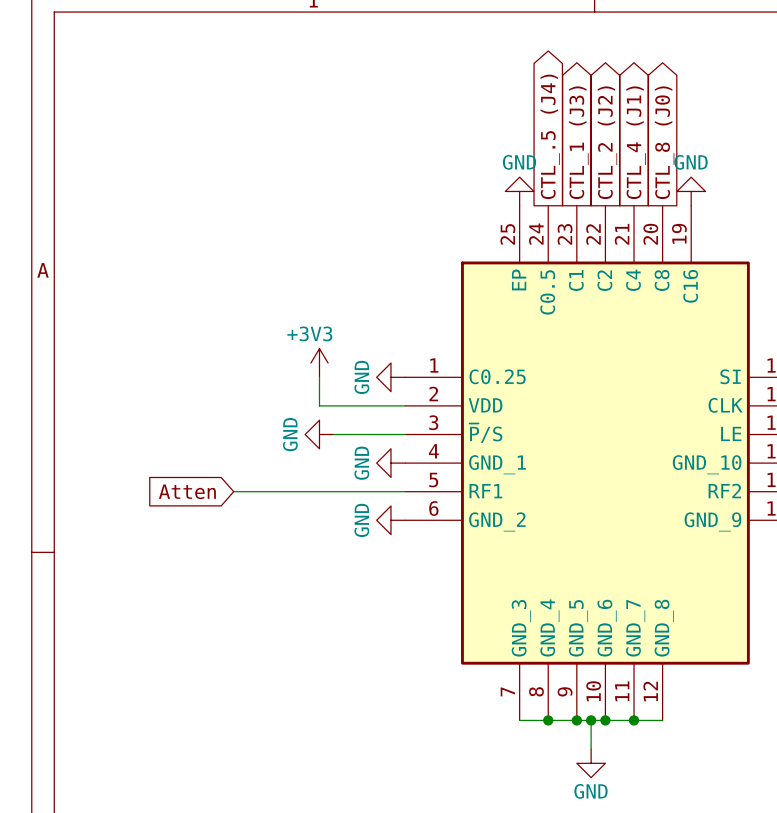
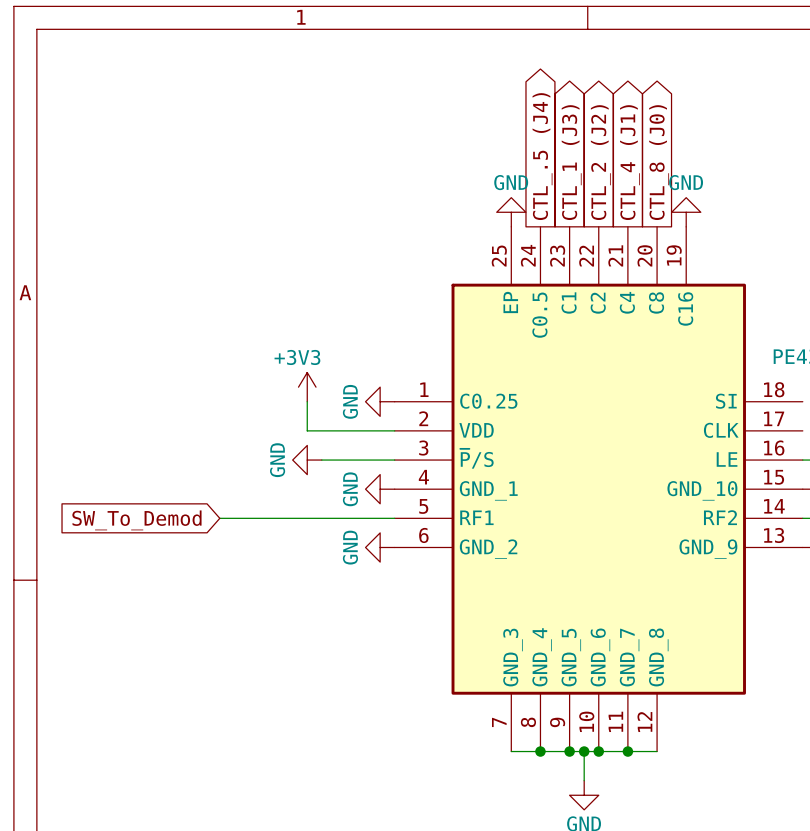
global label: Atten (187, 491) -> SW_To_Demod (136, 520)

